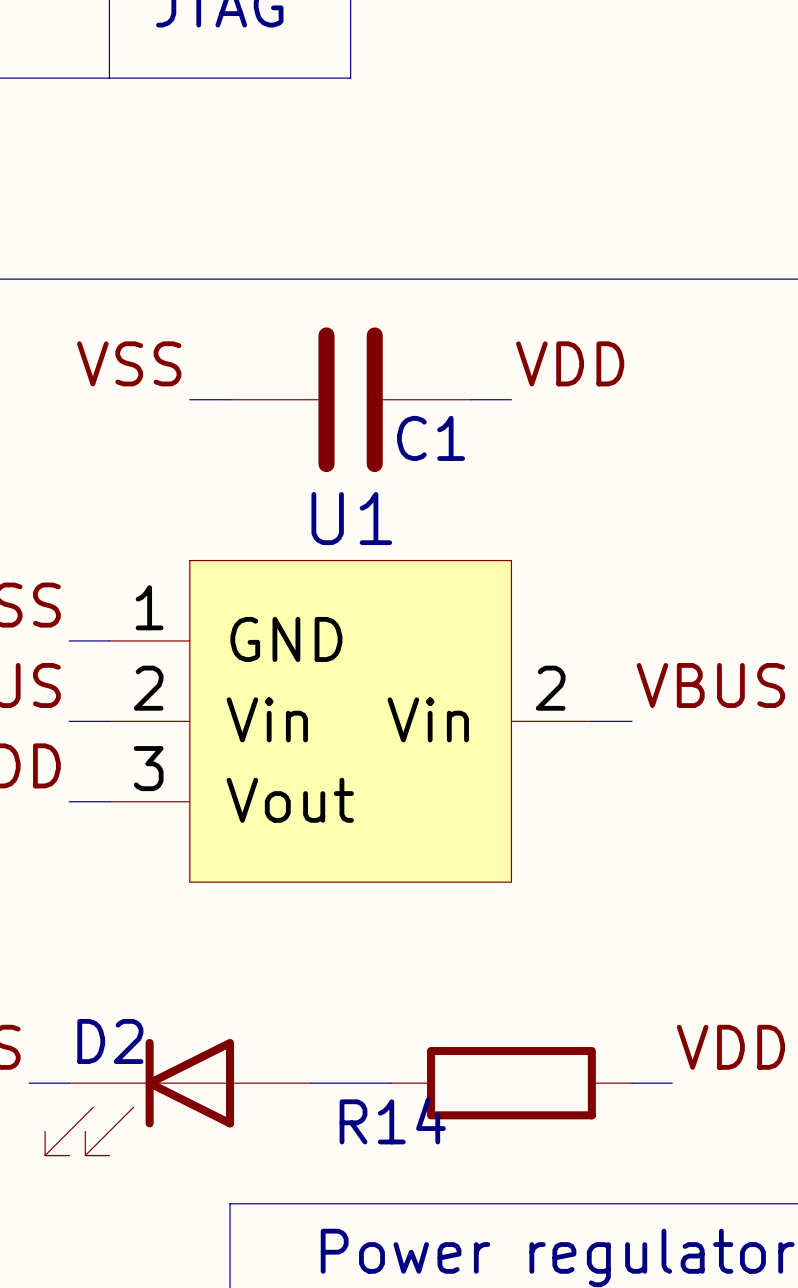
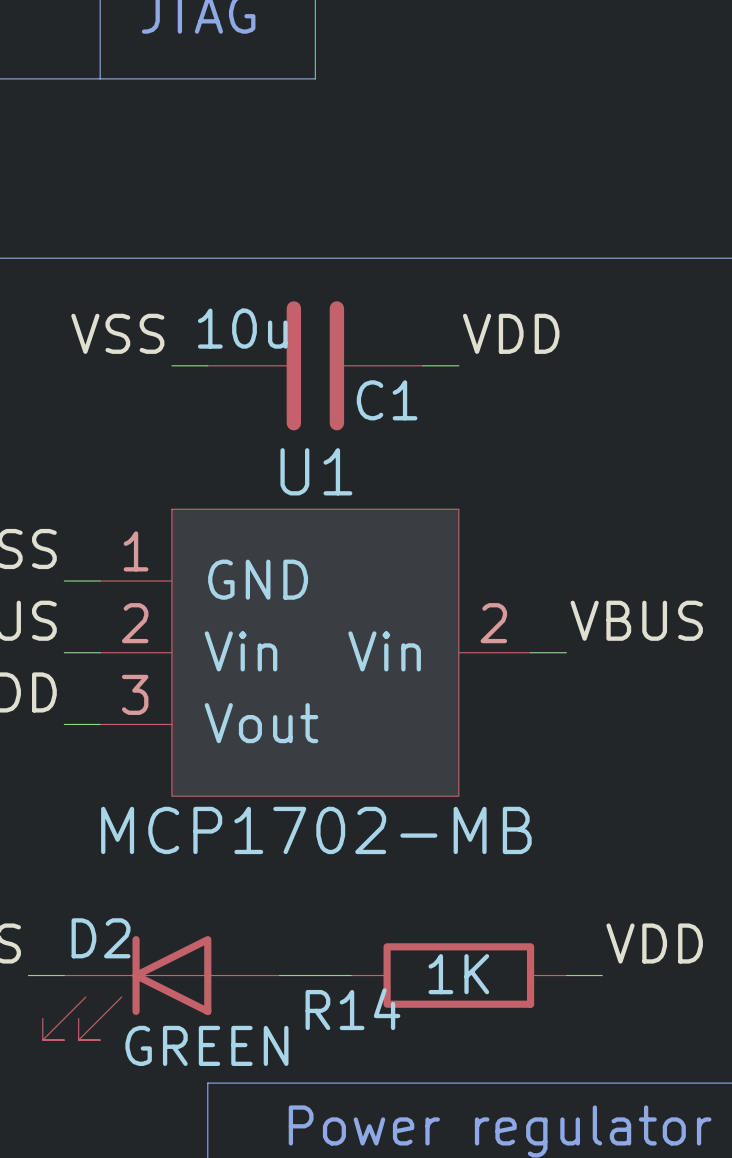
C1 value: none -> 10u (242, 328)
U1 value: none -> MCP1702-MB (316, 830)
R14 value: none -> 1K (458, 974)
D2 value: none -> GREEN (206, 1045)

